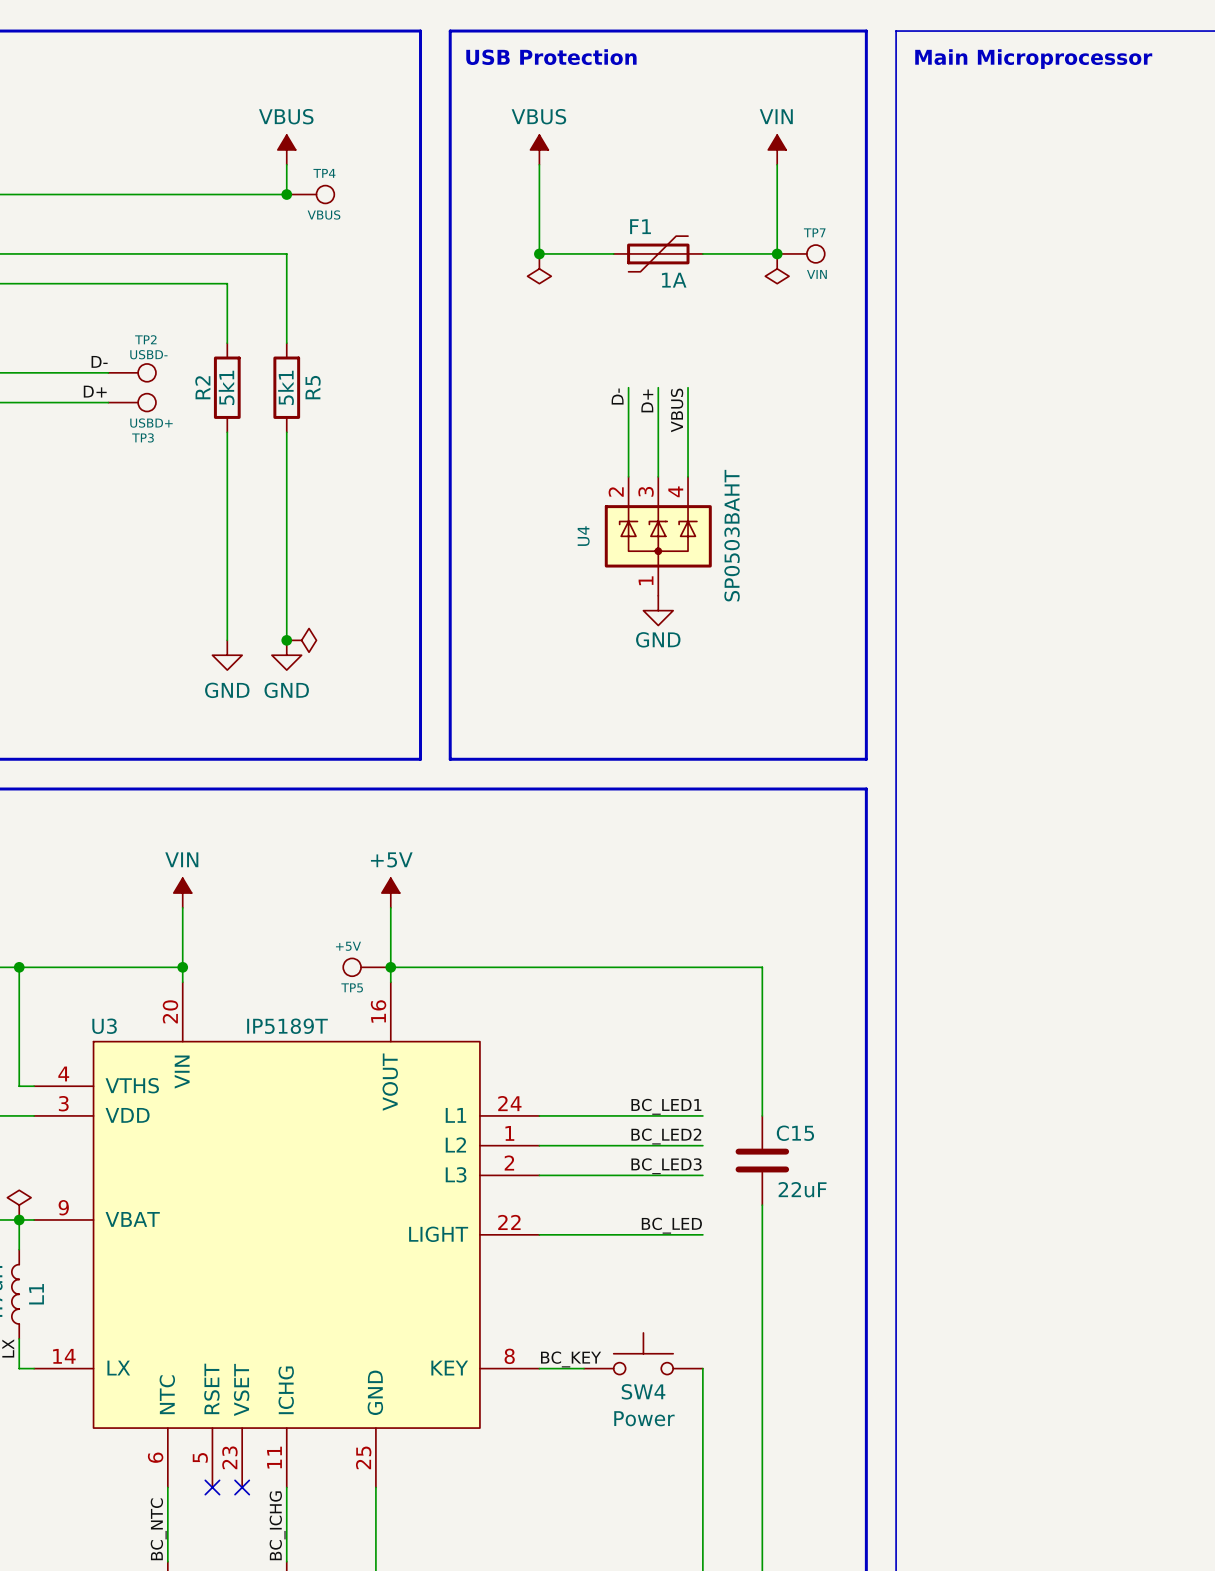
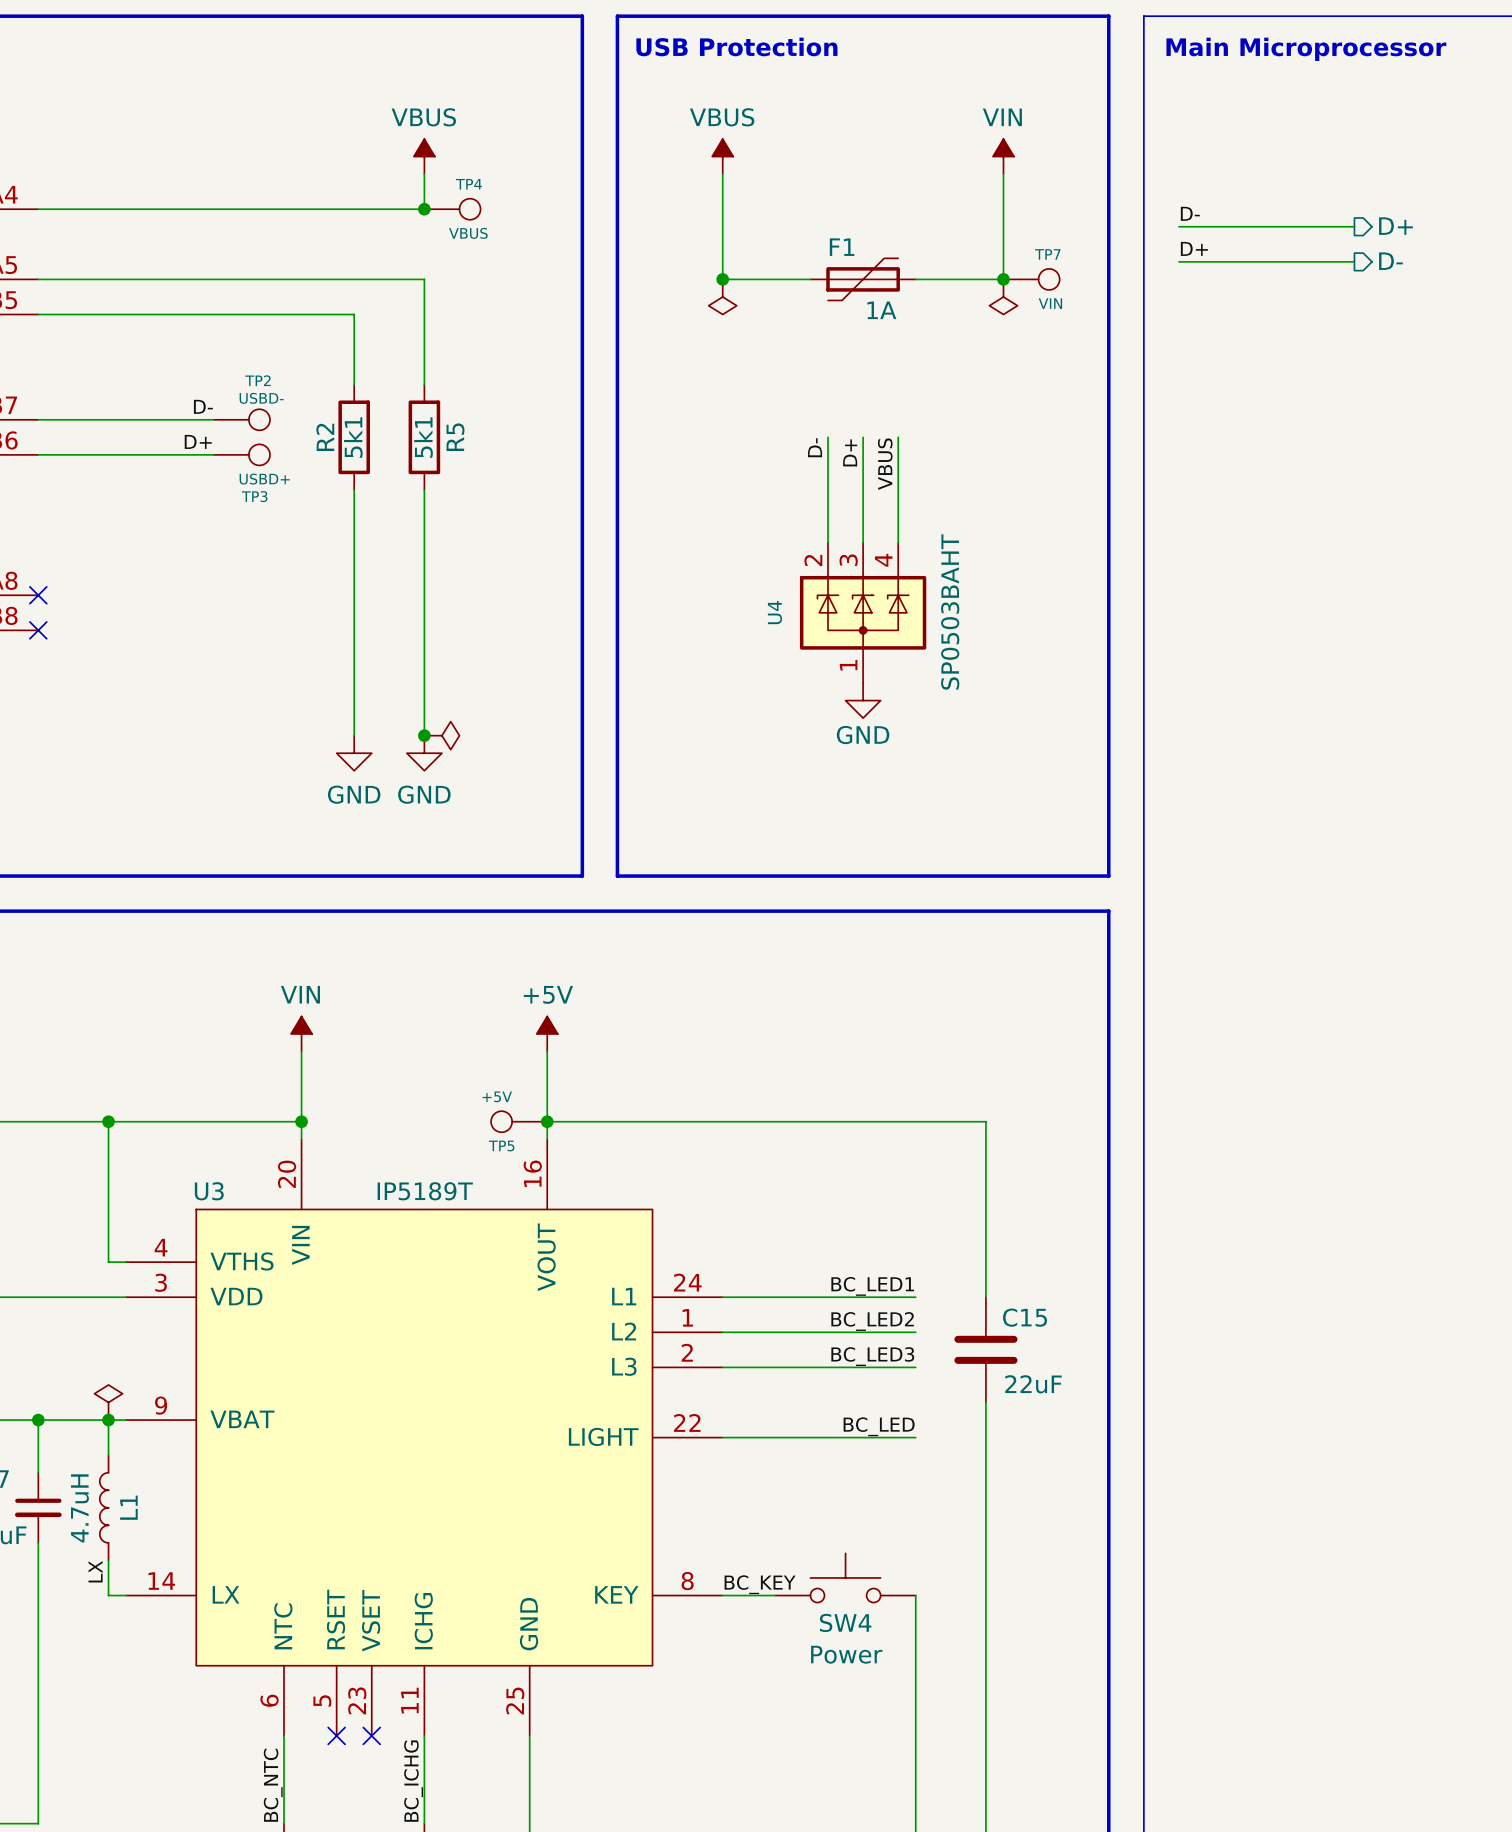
label: none -> D- (1190, 213)
sheet pin: none -> D+ (1395, 226)
wire: none -> (1178, 226) (1354, 226)
label: none -> D+ (1194, 248)
sheet pin: none -> D- (1390, 261)
wire: none -> (1178, 261) (1354, 261)

